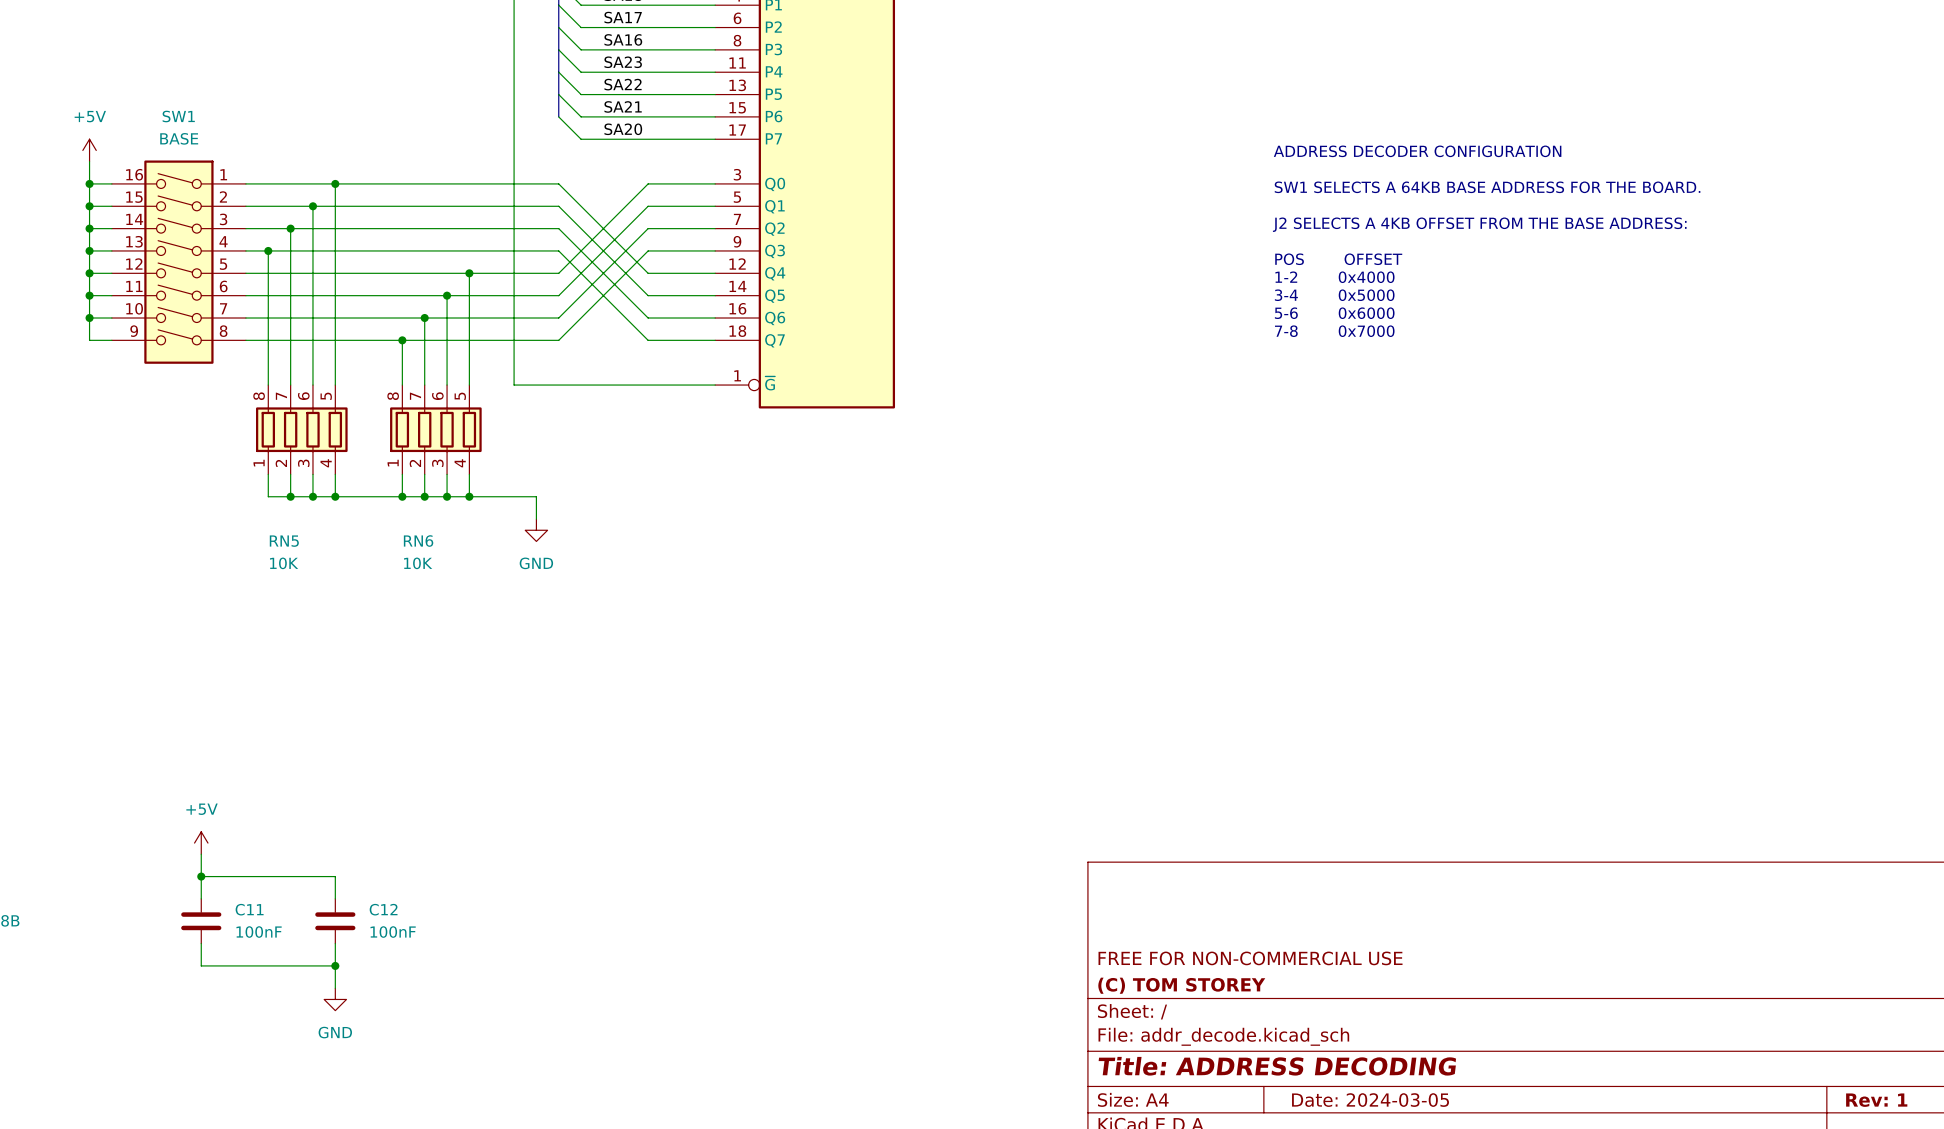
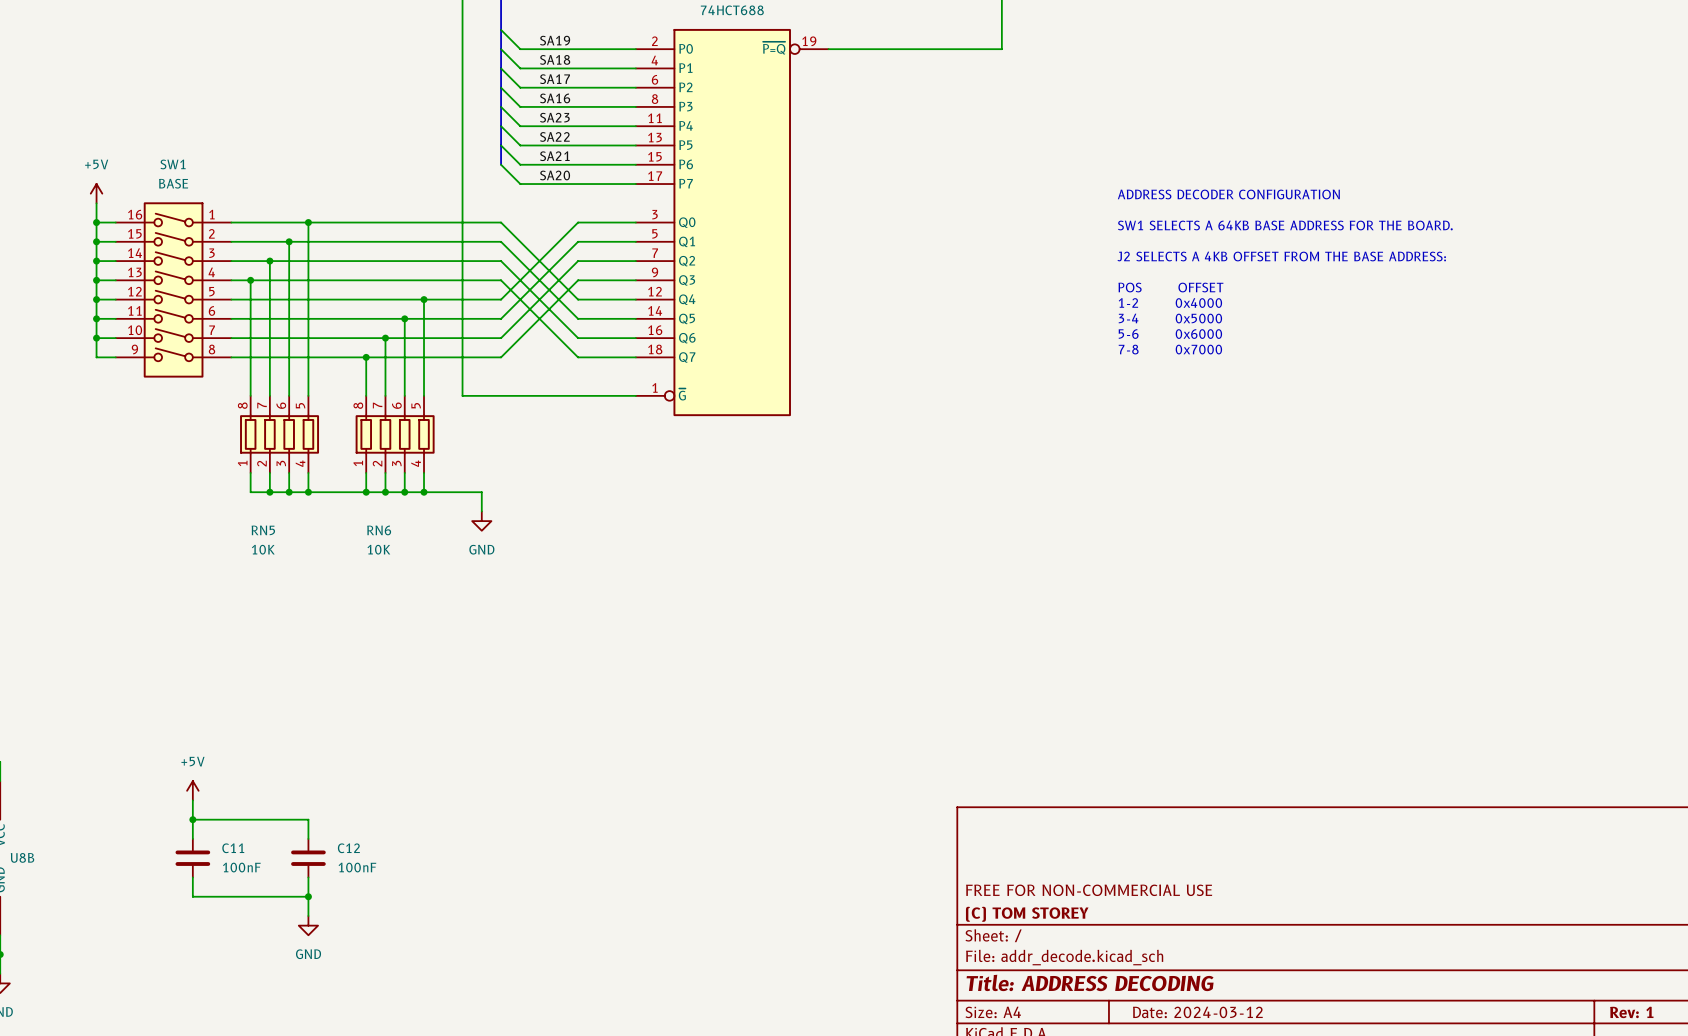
title block: Date: 2024-03-05 (1370, 1100) -> Date: 2024-03-12 (1197, 1012)

